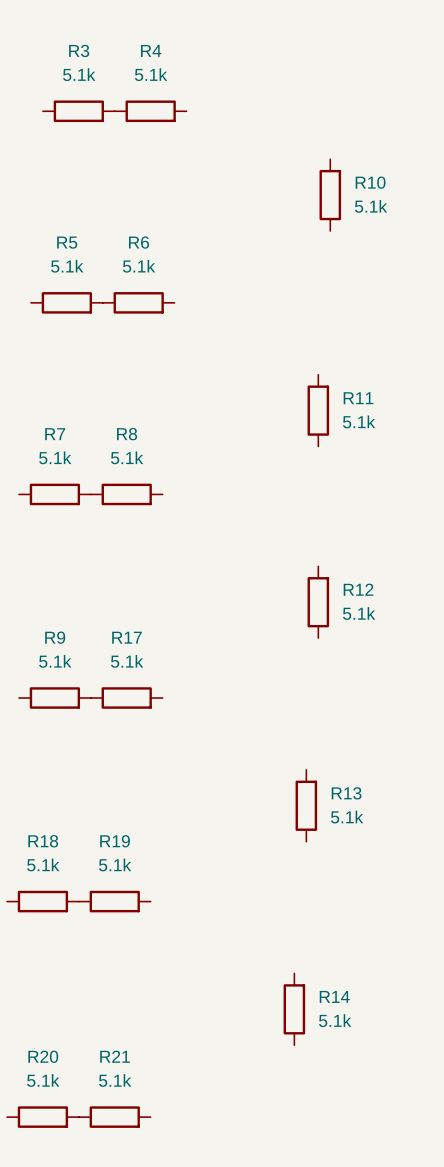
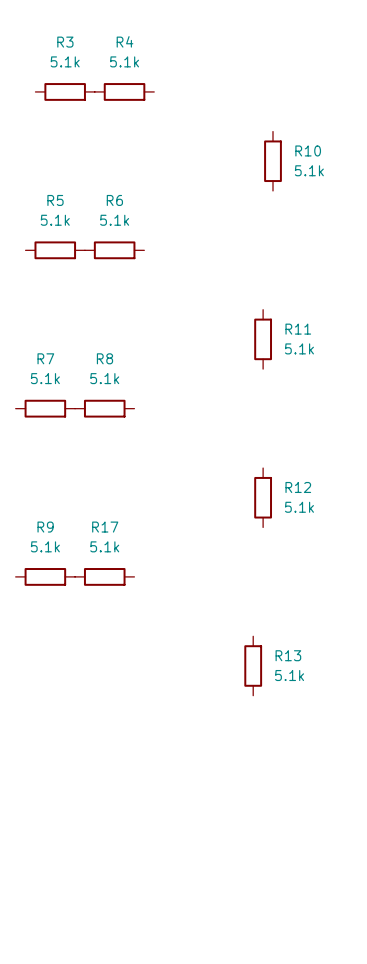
R18: 5.1k (42, 901) -> none
R19: 5.1k (114, 901) -> none
R14: 5.1k (294, 1009) -> none
R20: 5.1k (42, 1117) -> none
R21: 5.1k (114, 1117) -> none

